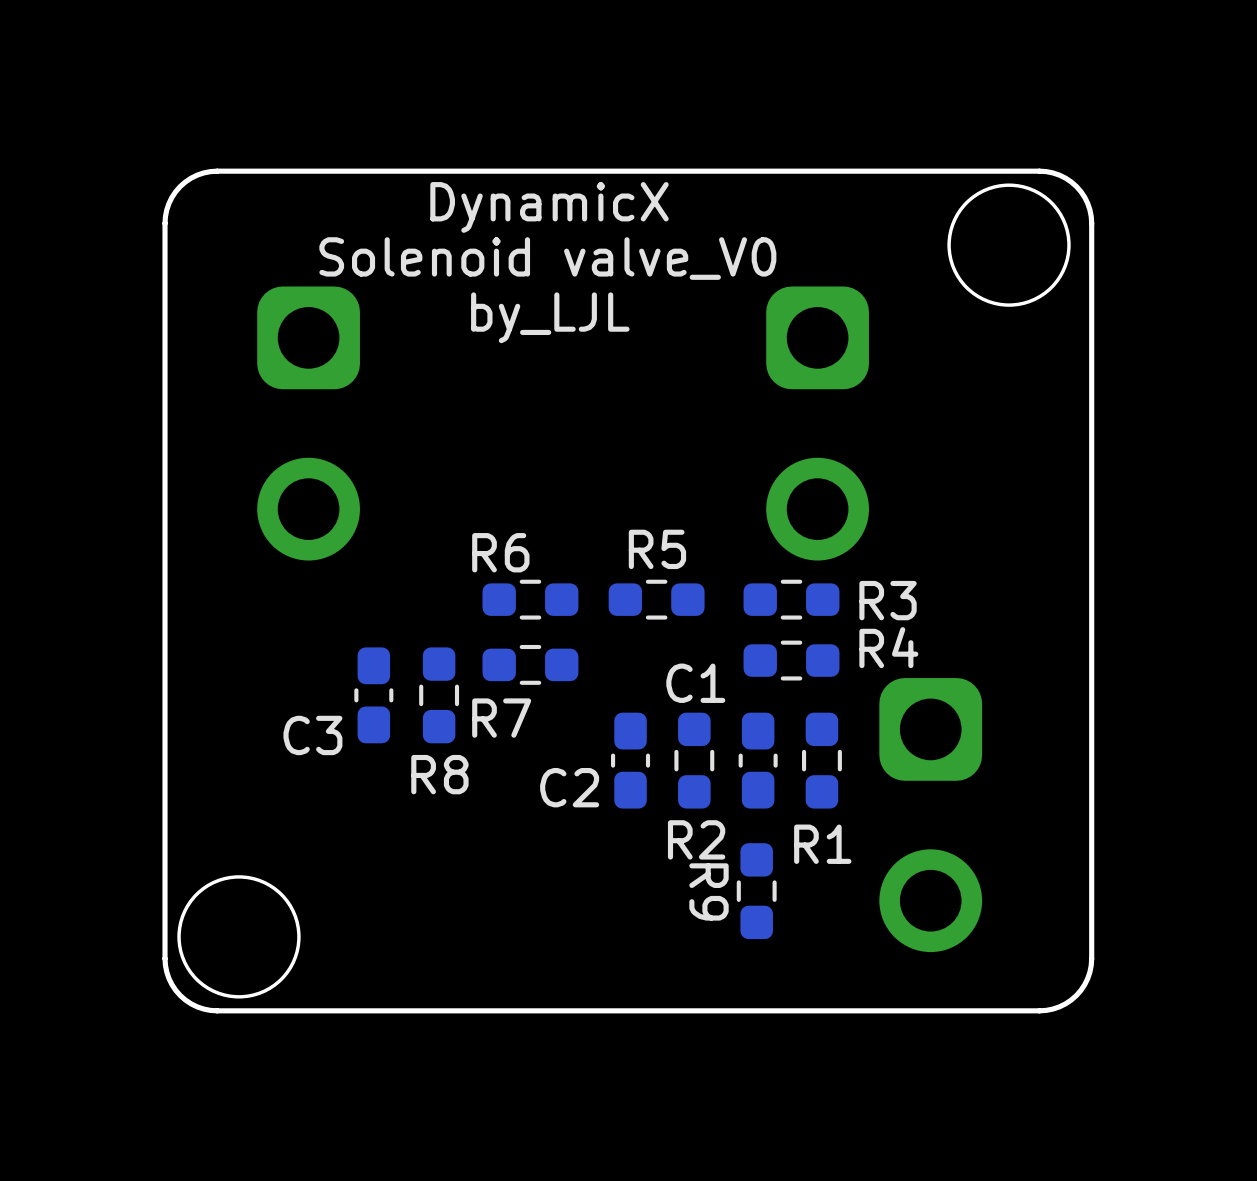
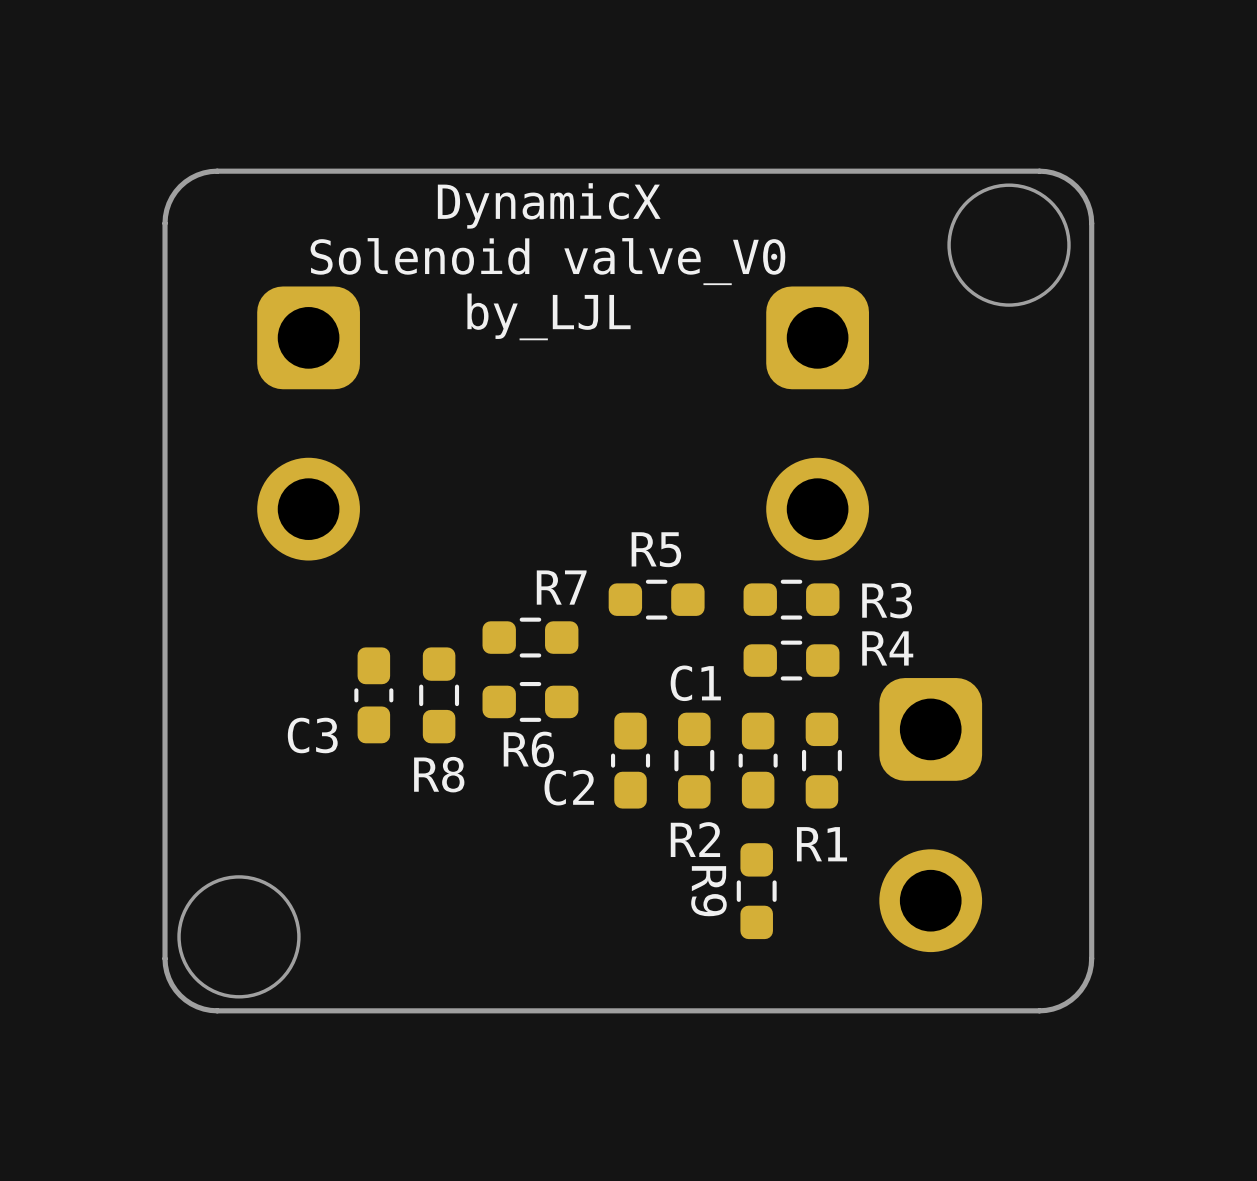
R6 name position: R6 (500, 552) -> R6 (528, 749)
R6 position: (530, 599) -> (530, 637)
R7 position: (530, 664) -> (530, 701)
R7 name position: R7 (501, 718) -> R7 (561, 587)

